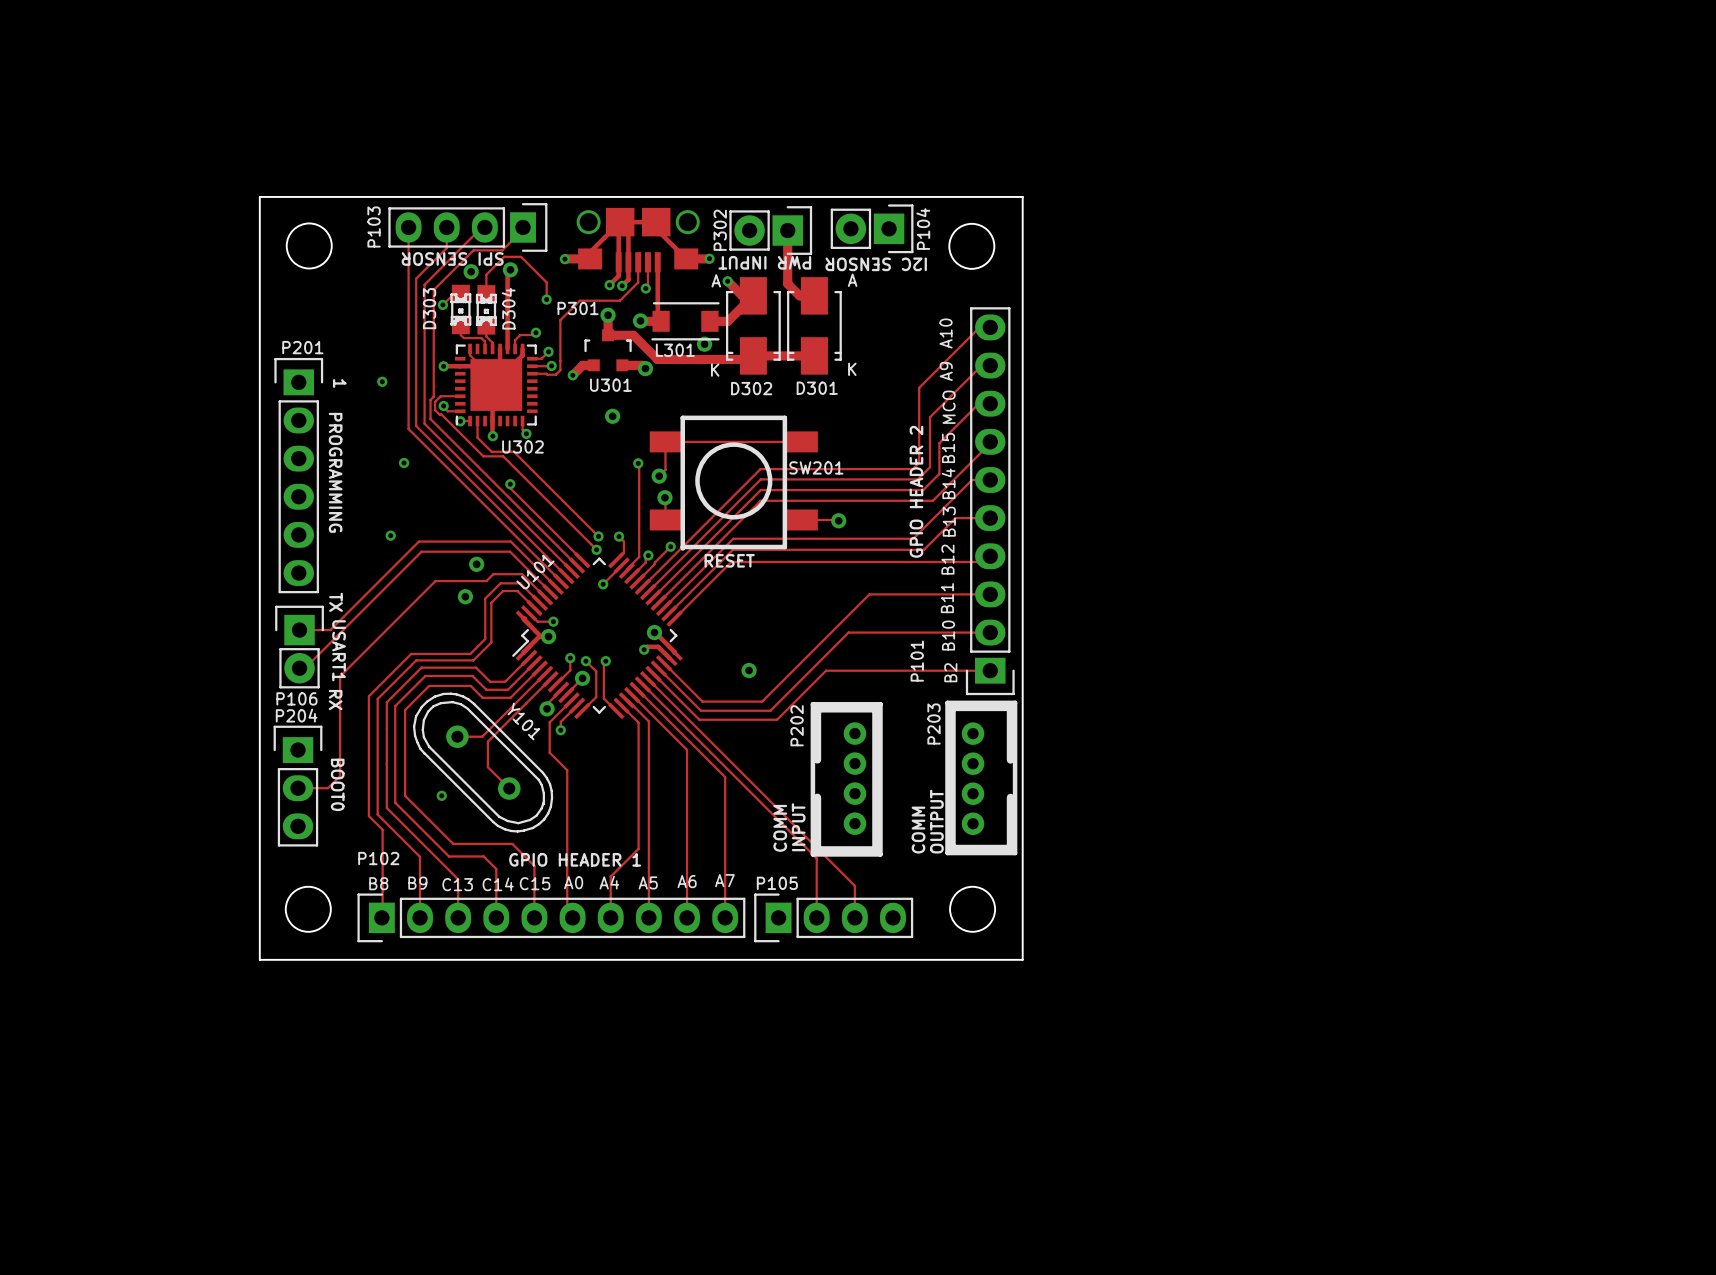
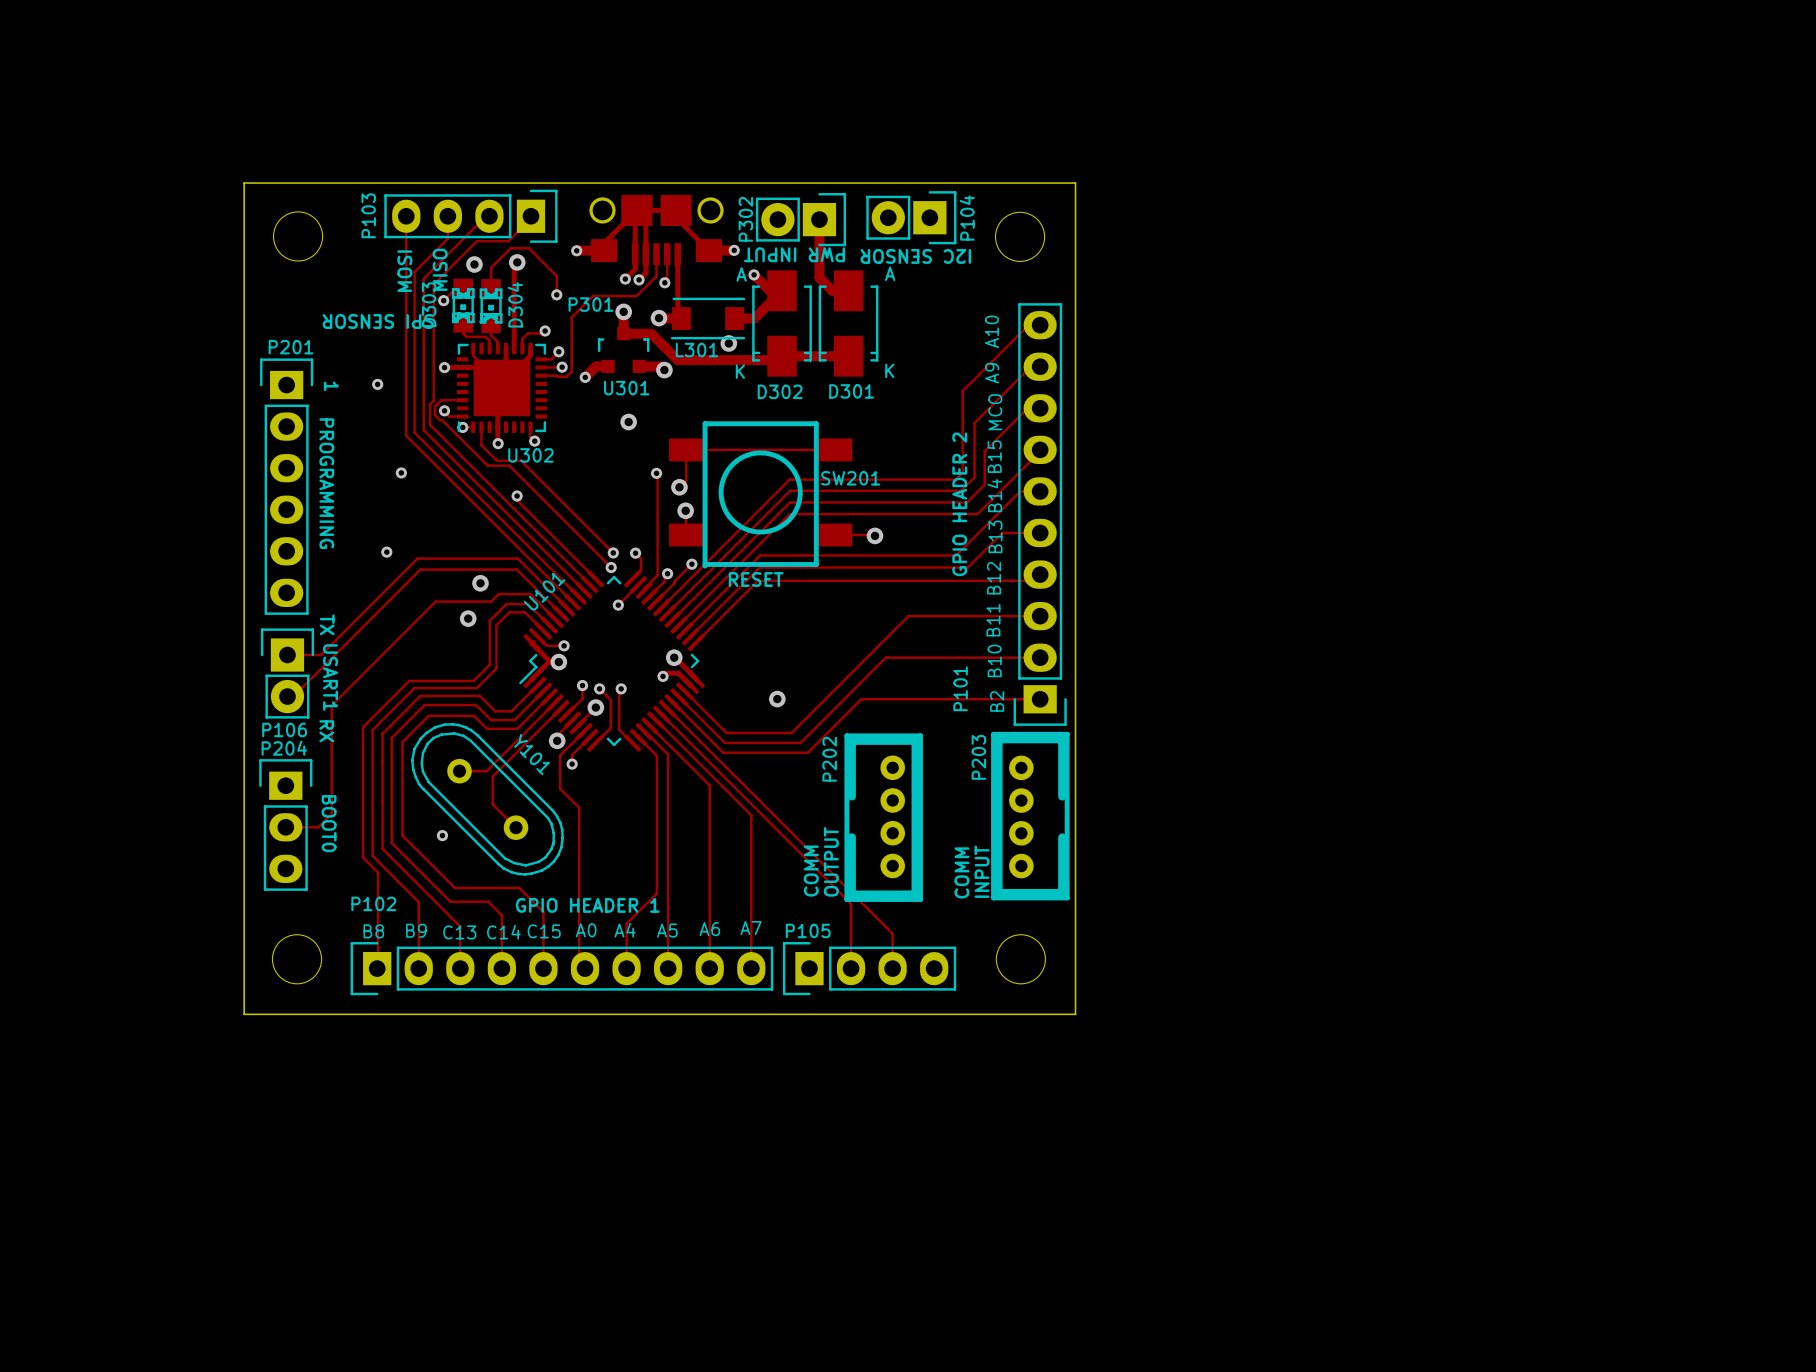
text position: SPI SENSOR (452, 258) -> SPI SENSOR (378, 321)
text: none -> MISO (440, 269)
text: none -> MOSI (404, 271)
text: OUTPUT (936, 821) -> INPUT (982, 871)
text: INPUT (798, 827) -> OUTPUT (831, 861)

